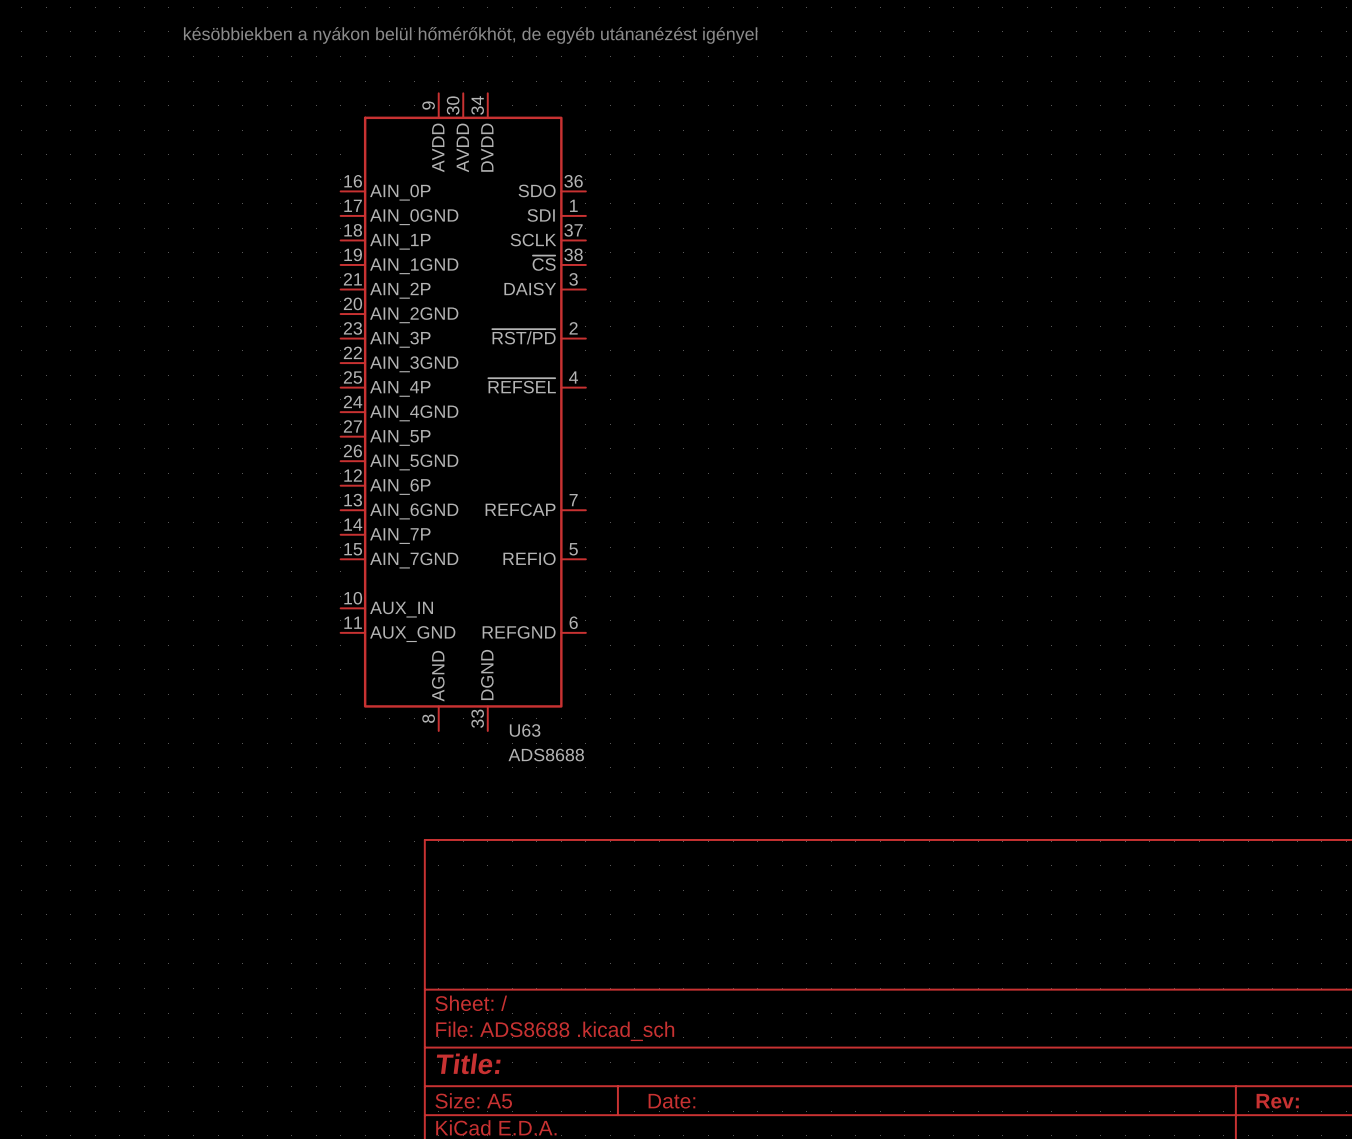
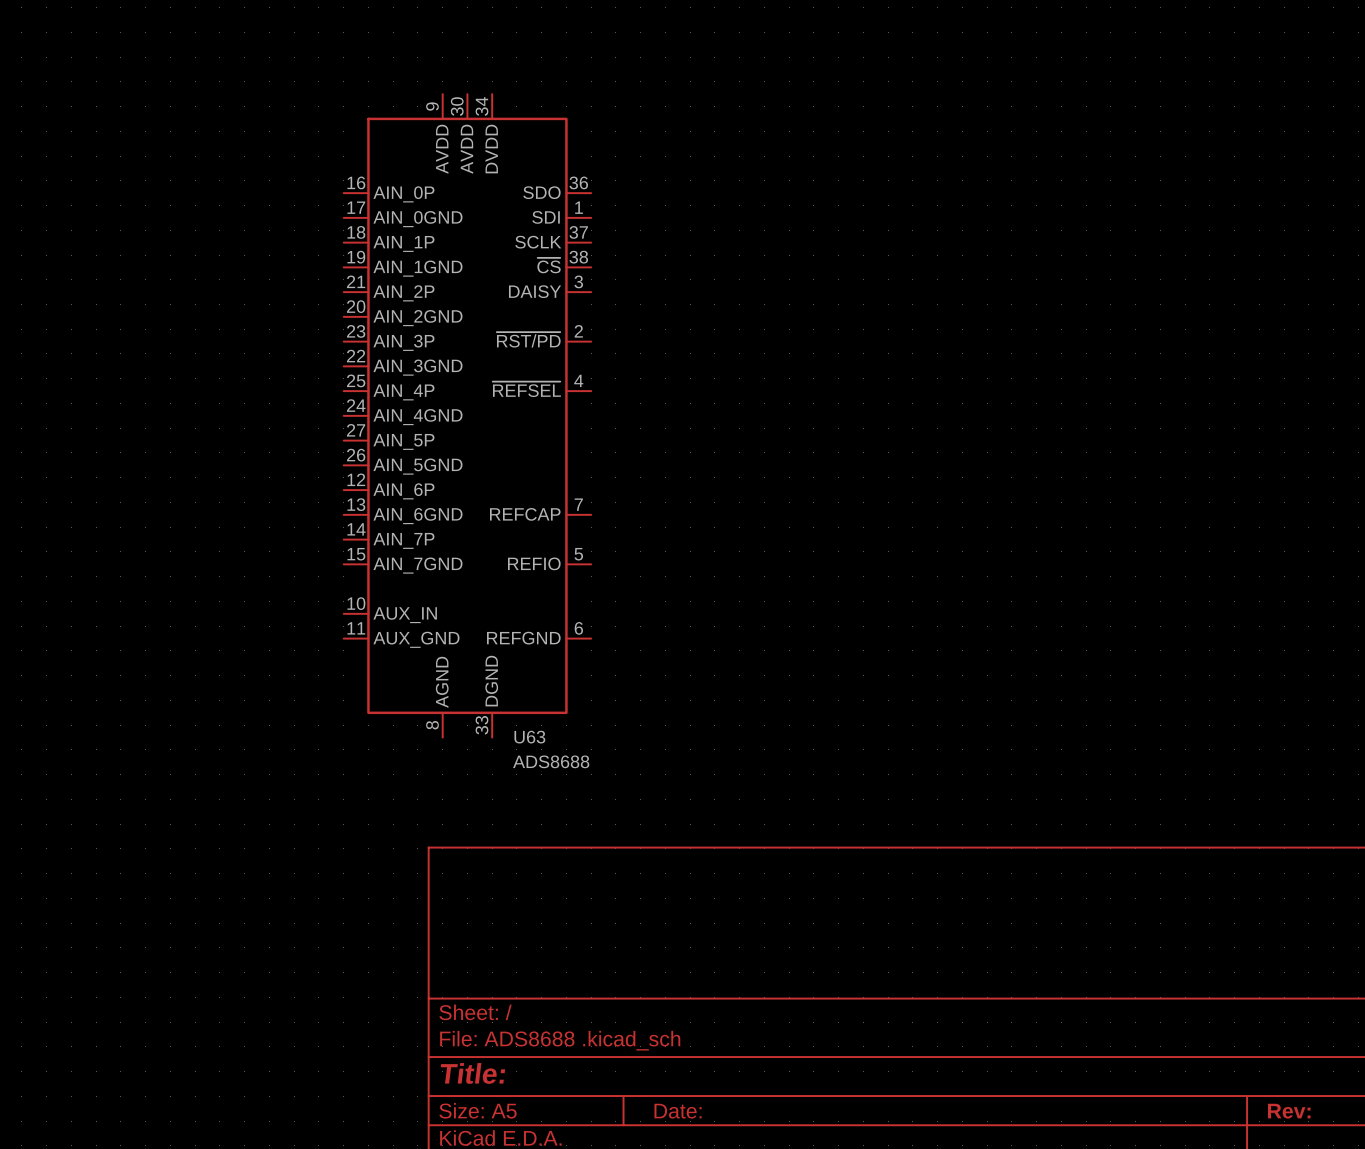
text: késöbbiekben a nyákon belül hőmérőkhöt, de egyéb utánanézést igényel (470, 35) -> none

